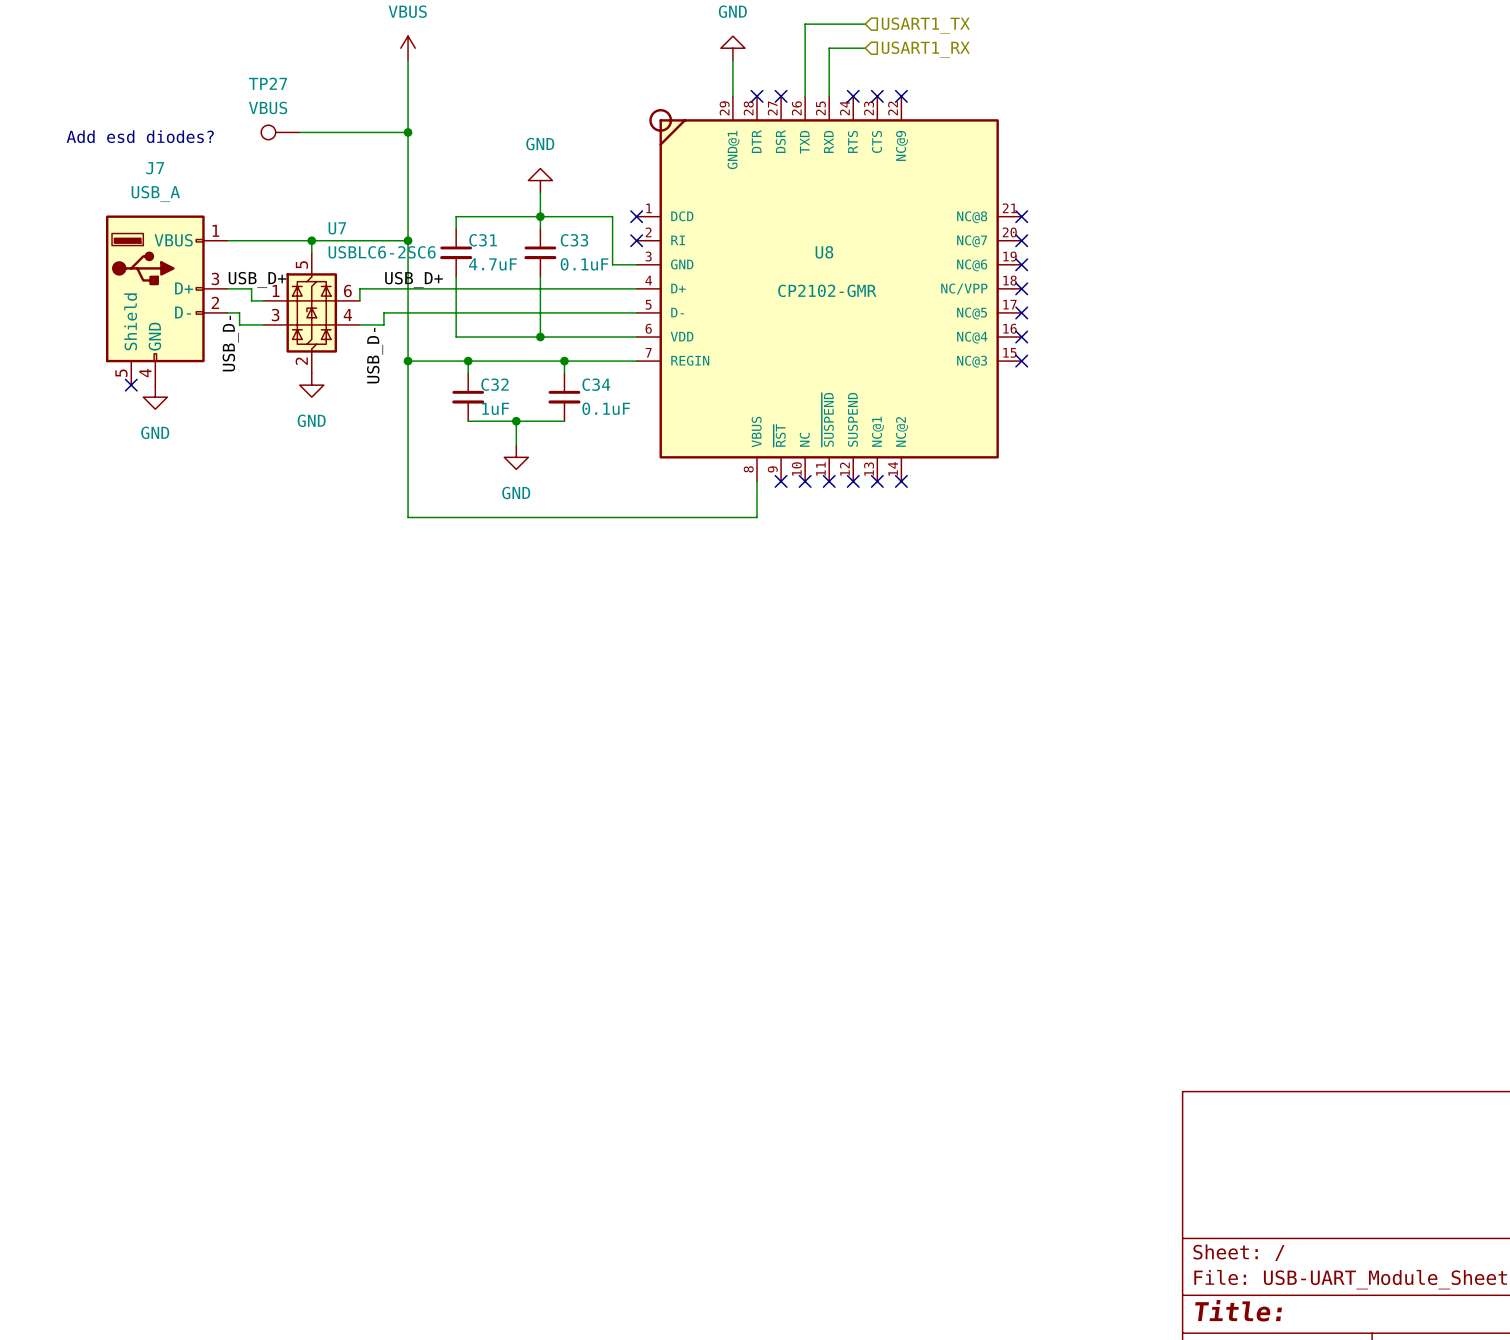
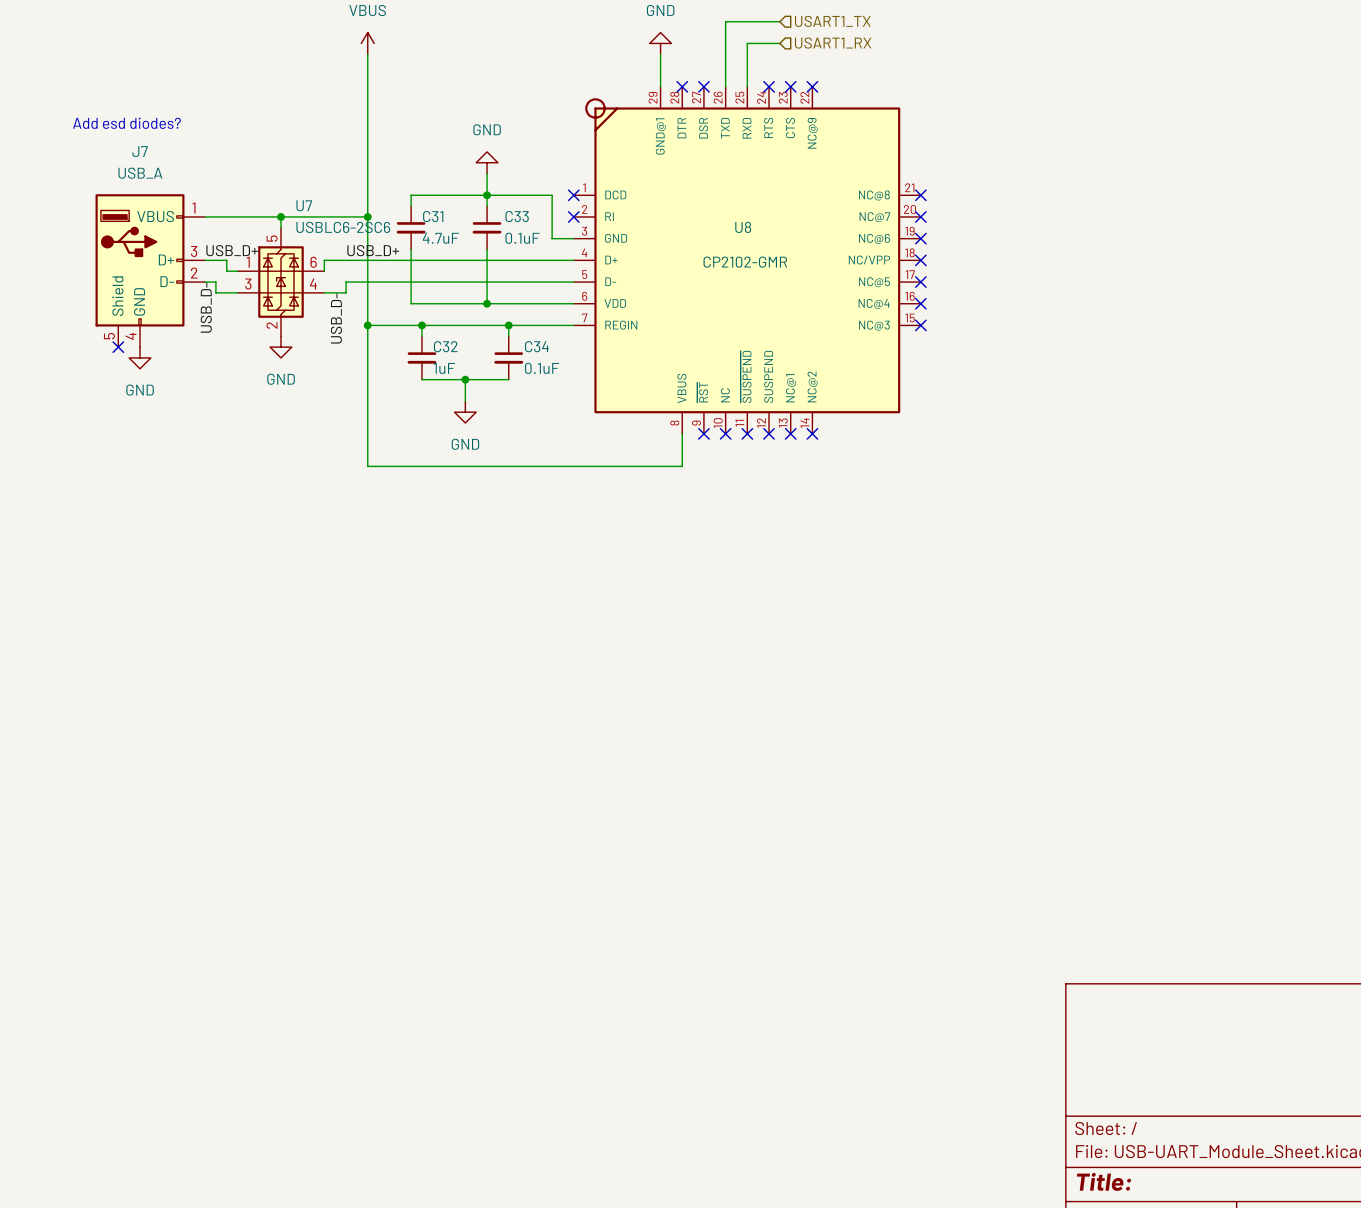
TP27: VBUS (280, 132) -> none
wire: (299, 132) (408, 132) -> none
junction: (408, 132) -> none

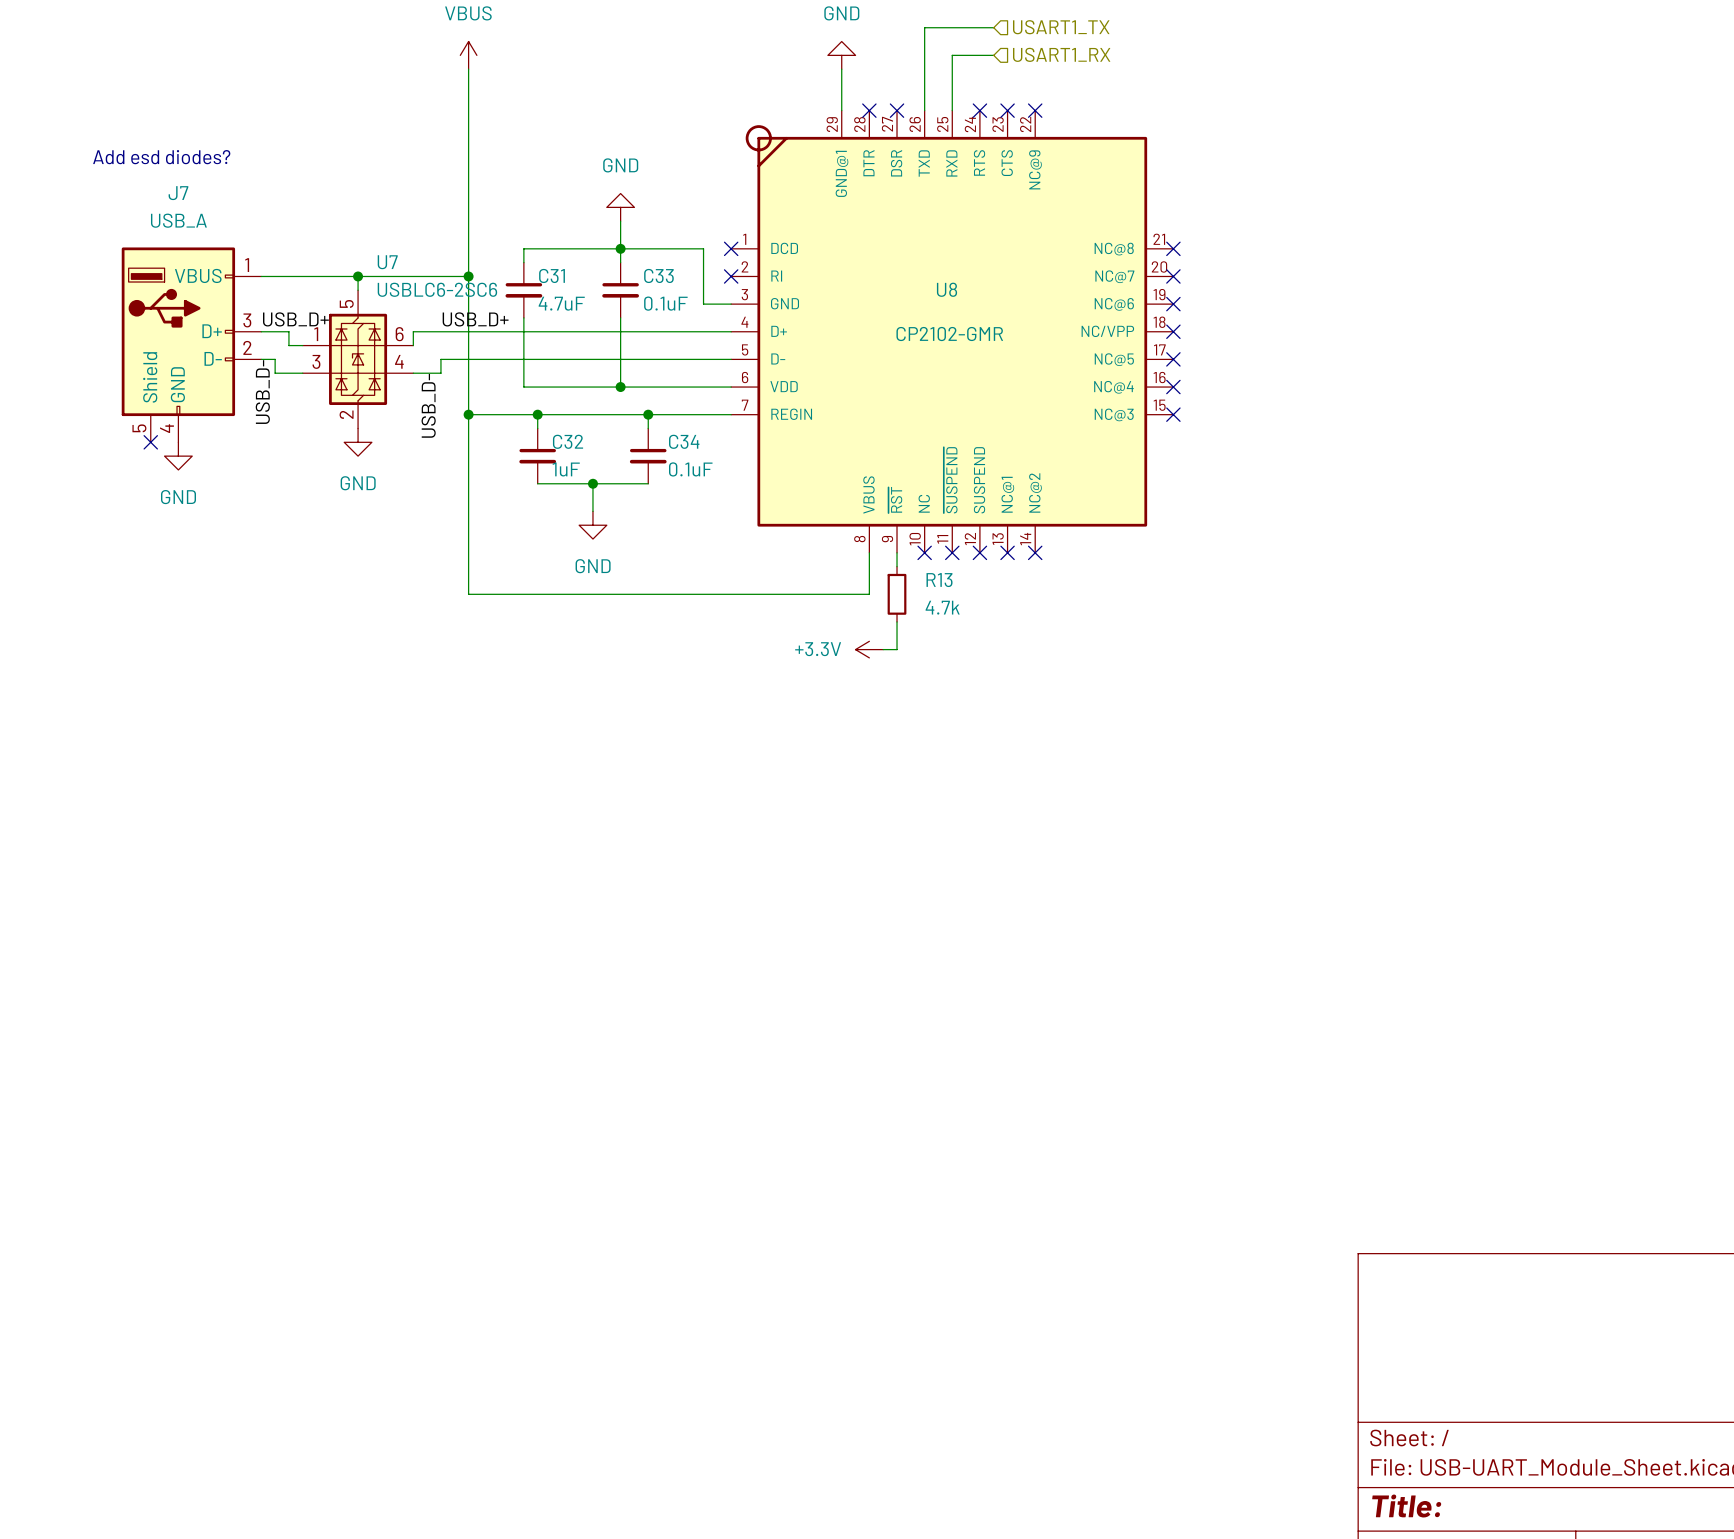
wire: none -> (897, 552) (897, 566)
no-connect mark: (703, 433) -> none
R13: none -> 4.7k (897, 594)
wire: none -> (897, 621) (897, 649) (883, 649)
power symbol: none -> +3.3V (869, 649)

